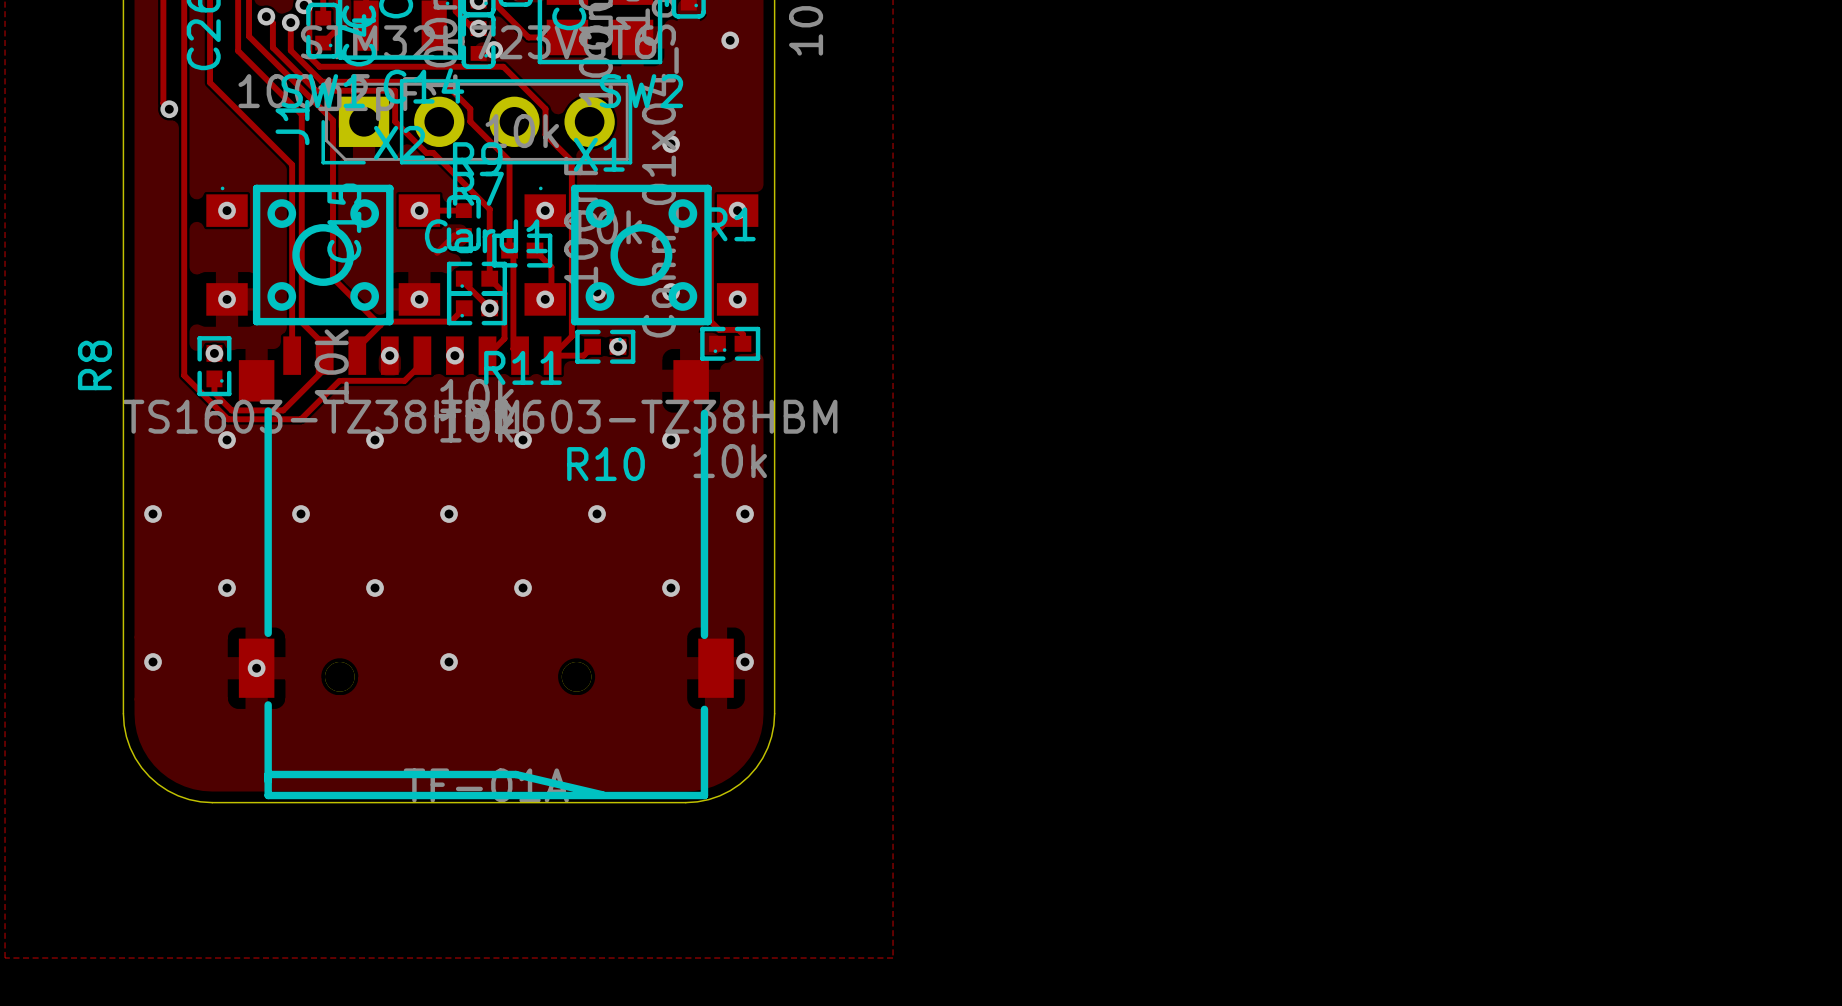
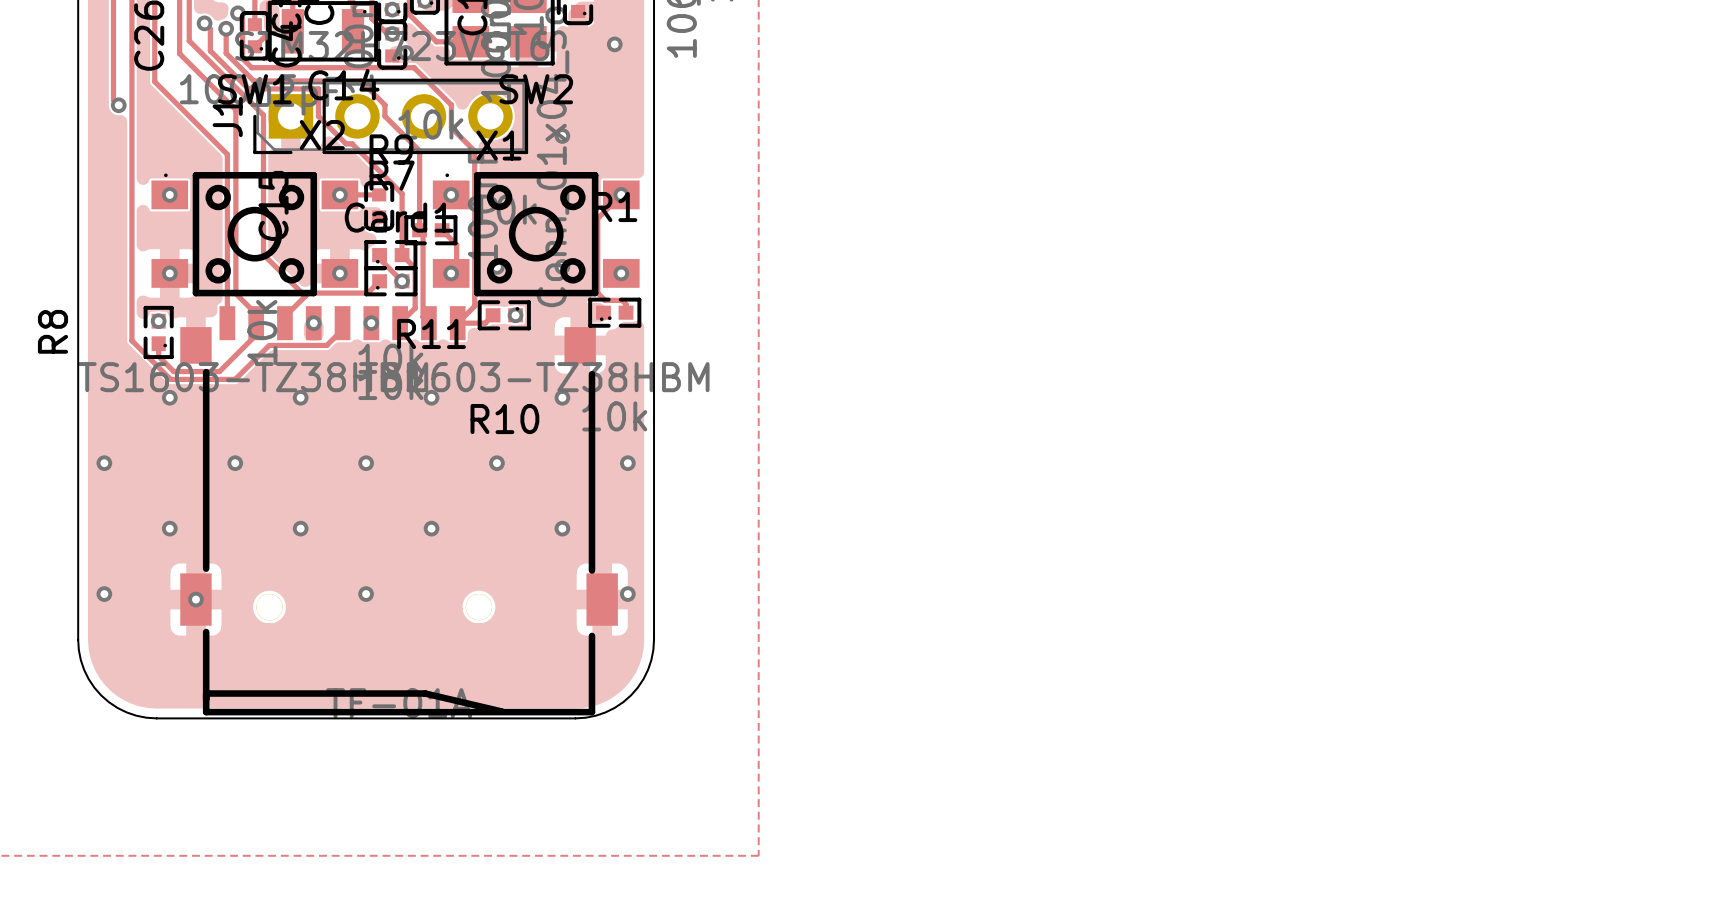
track: (463, 235) (454, 235) (437, 252) -> none

